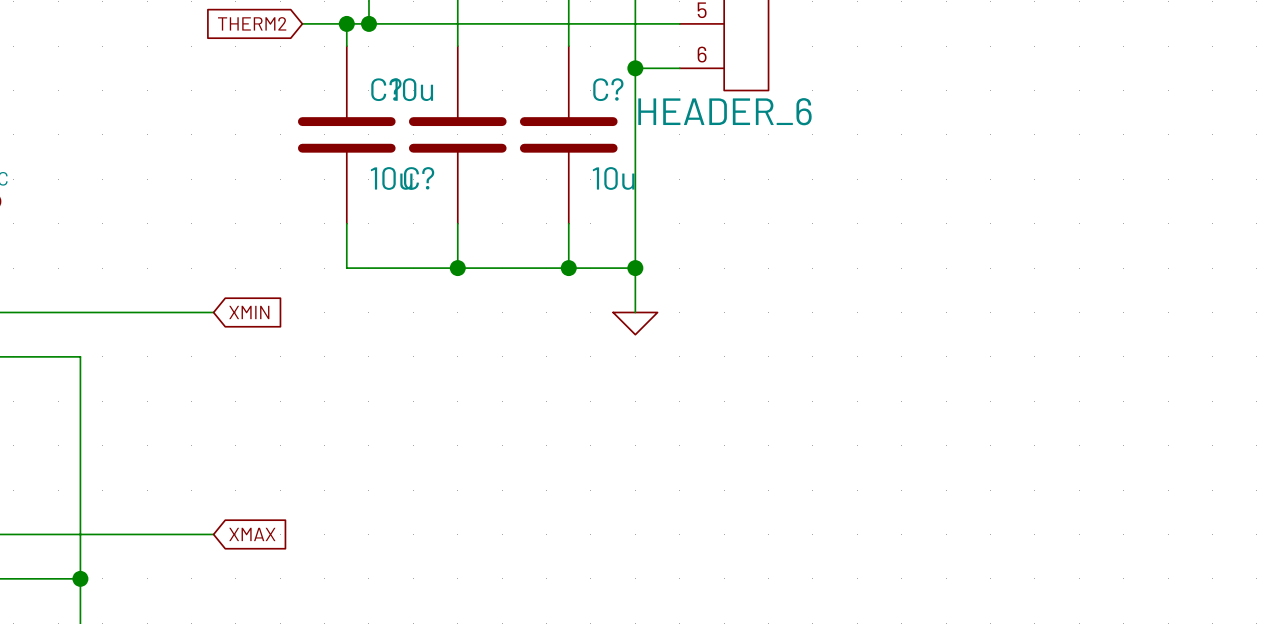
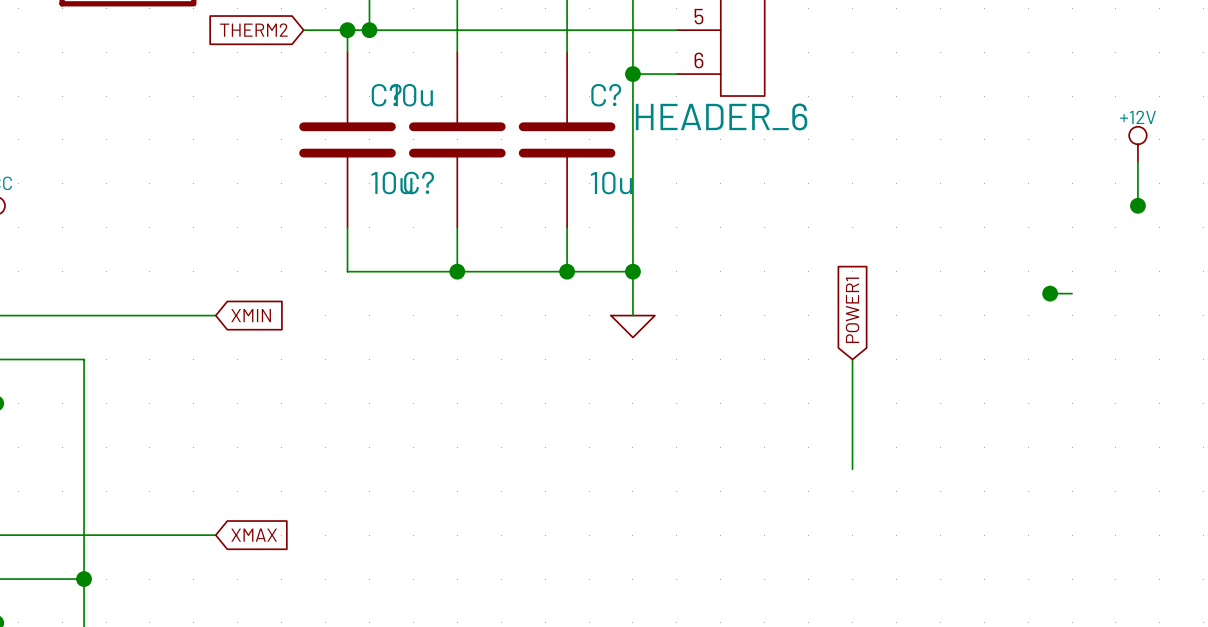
power symbol: none -> +12V (1137, 144)
wire: none -> (1137, 161) (1137, 205)
junction: none -> (1137, 205)
wire: none -> (1050, 293) (1072, 293)
junction: none -> (1050, 293)
global label: none -> POWER1 (852, 310)
wire: none -> (852, 359) (852, 469)

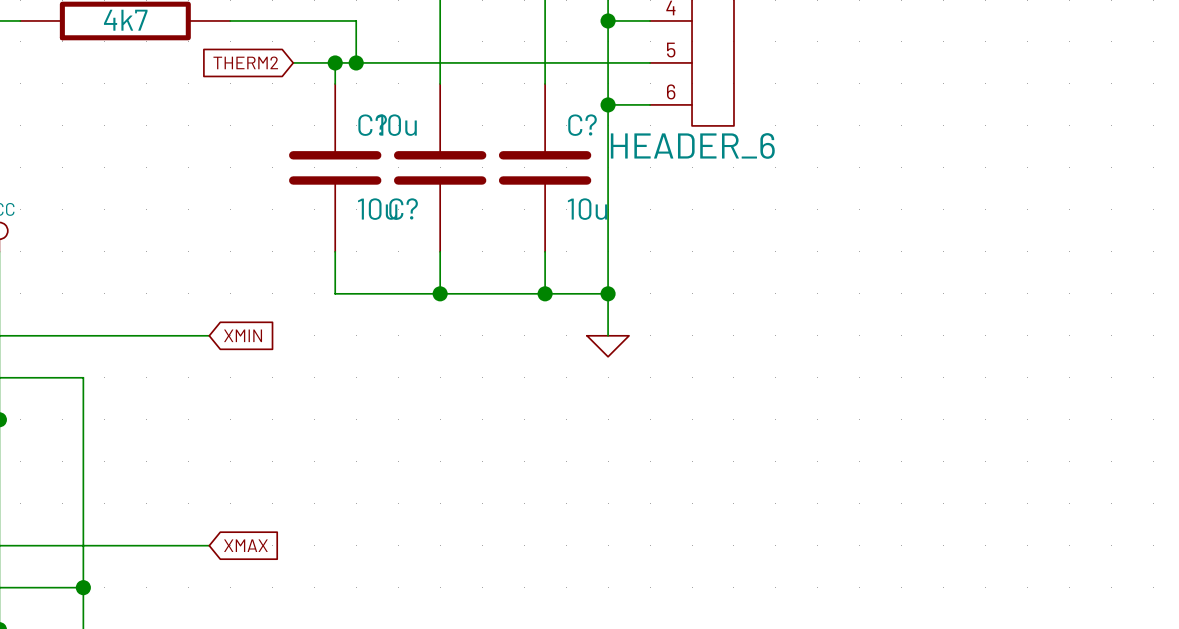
power symbol: +12V (1137, 144) -> none
wire: (1137, 161) (1137, 205) -> none
junction: (1137, 205) -> none
wire: (1050, 293) (1072, 293) -> none
junction: (1050, 293) -> none
global label: POWER1 (852, 310) -> none
wire: (852, 359) (852, 469) -> none

